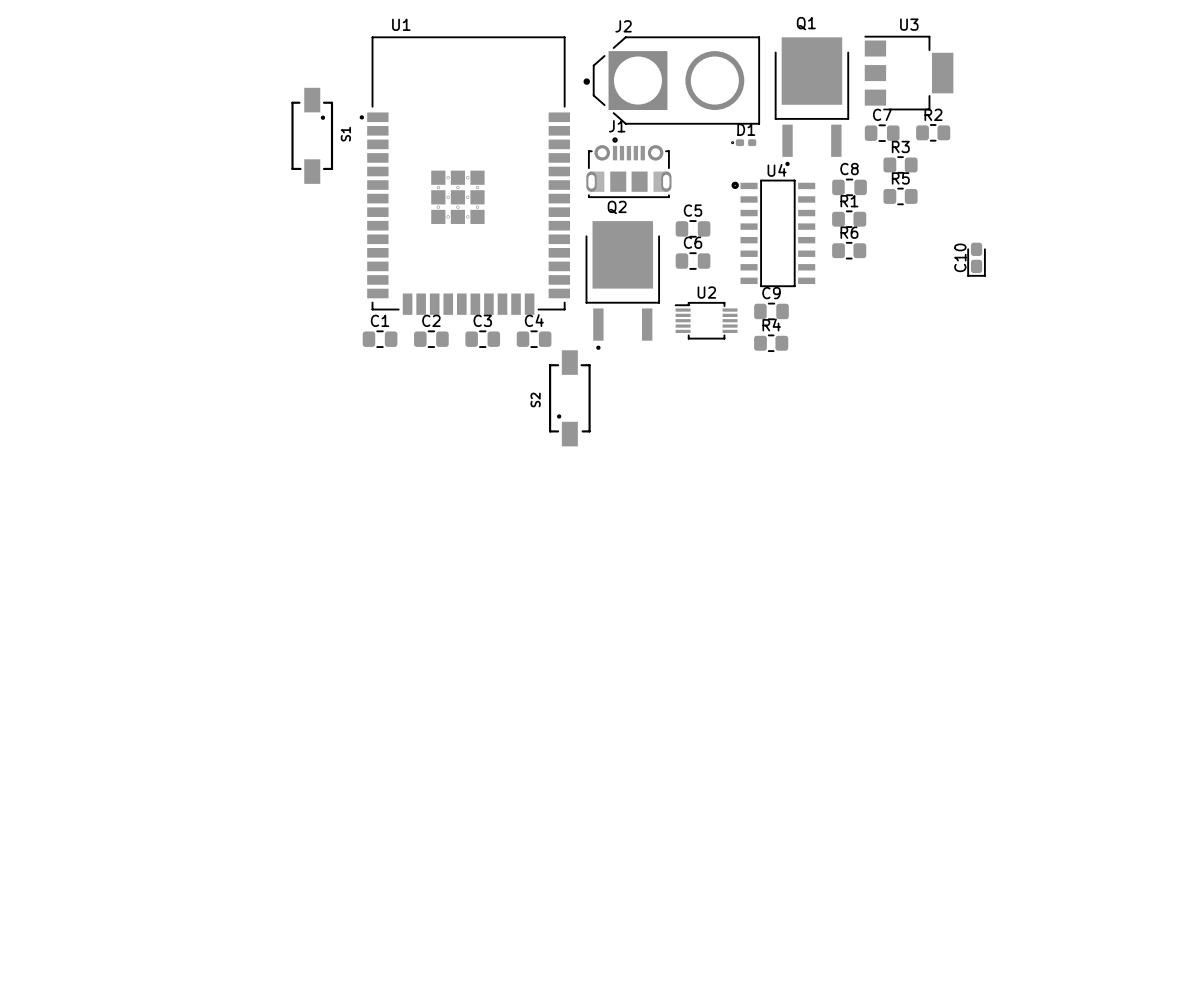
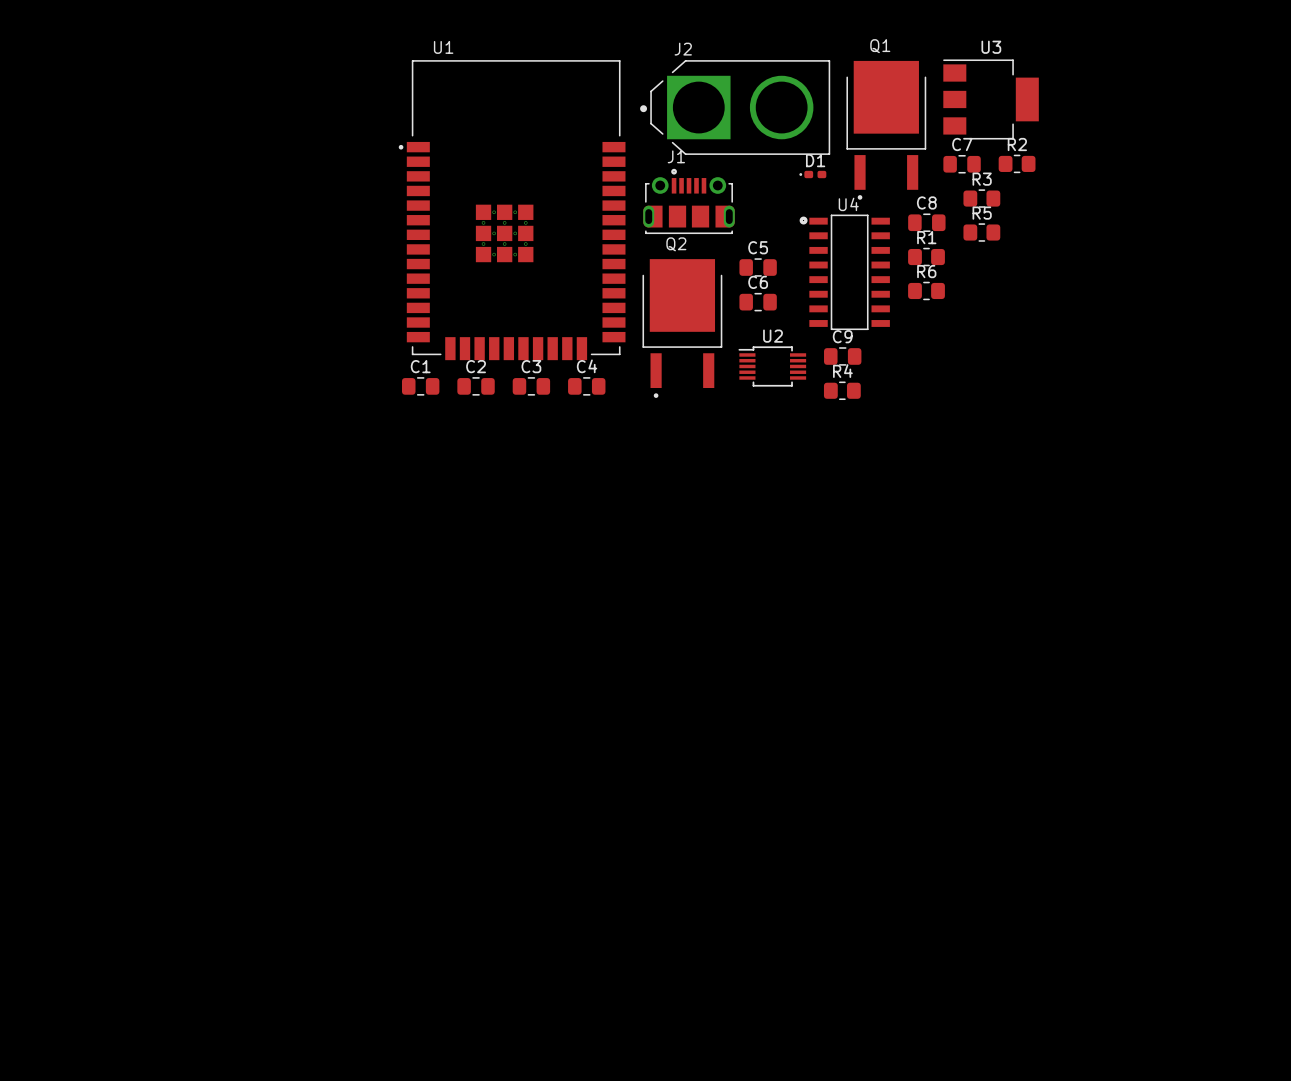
S1: (312, 135) -> none
C10: (976, 259) -> none
S2: (569, 398) -> none

